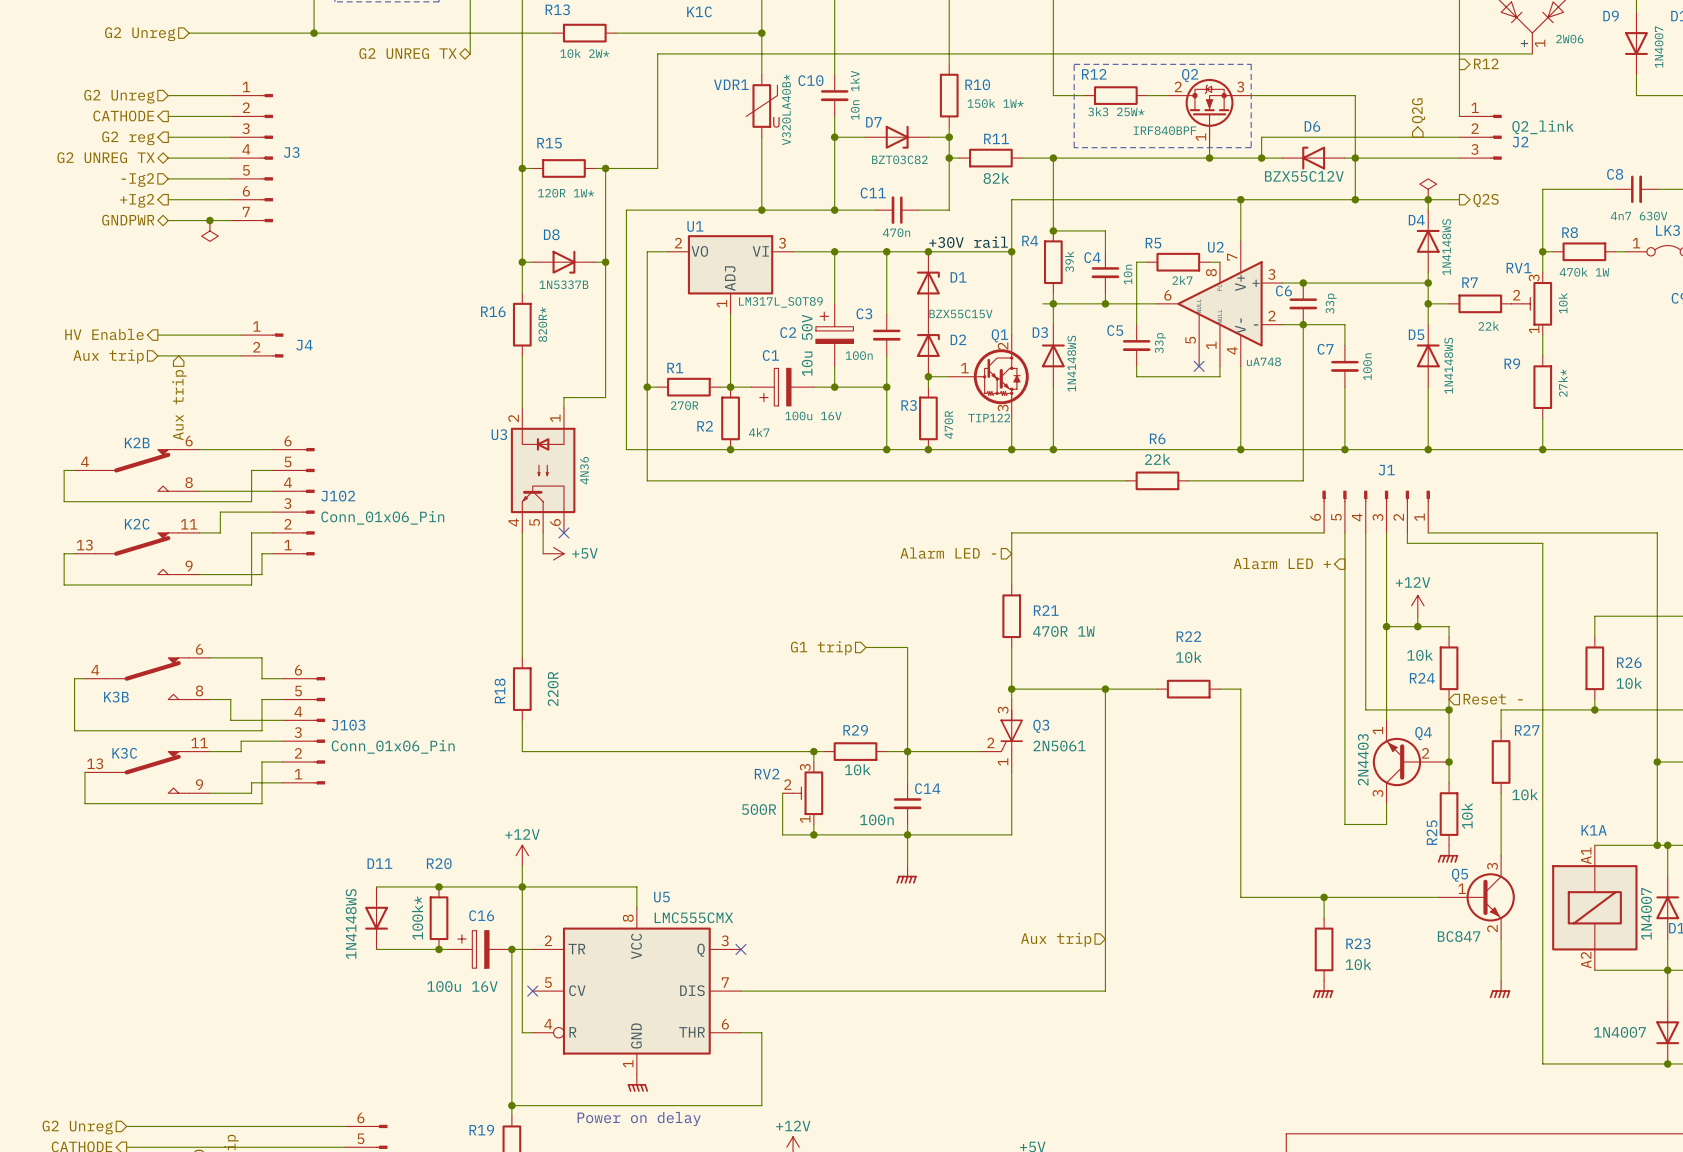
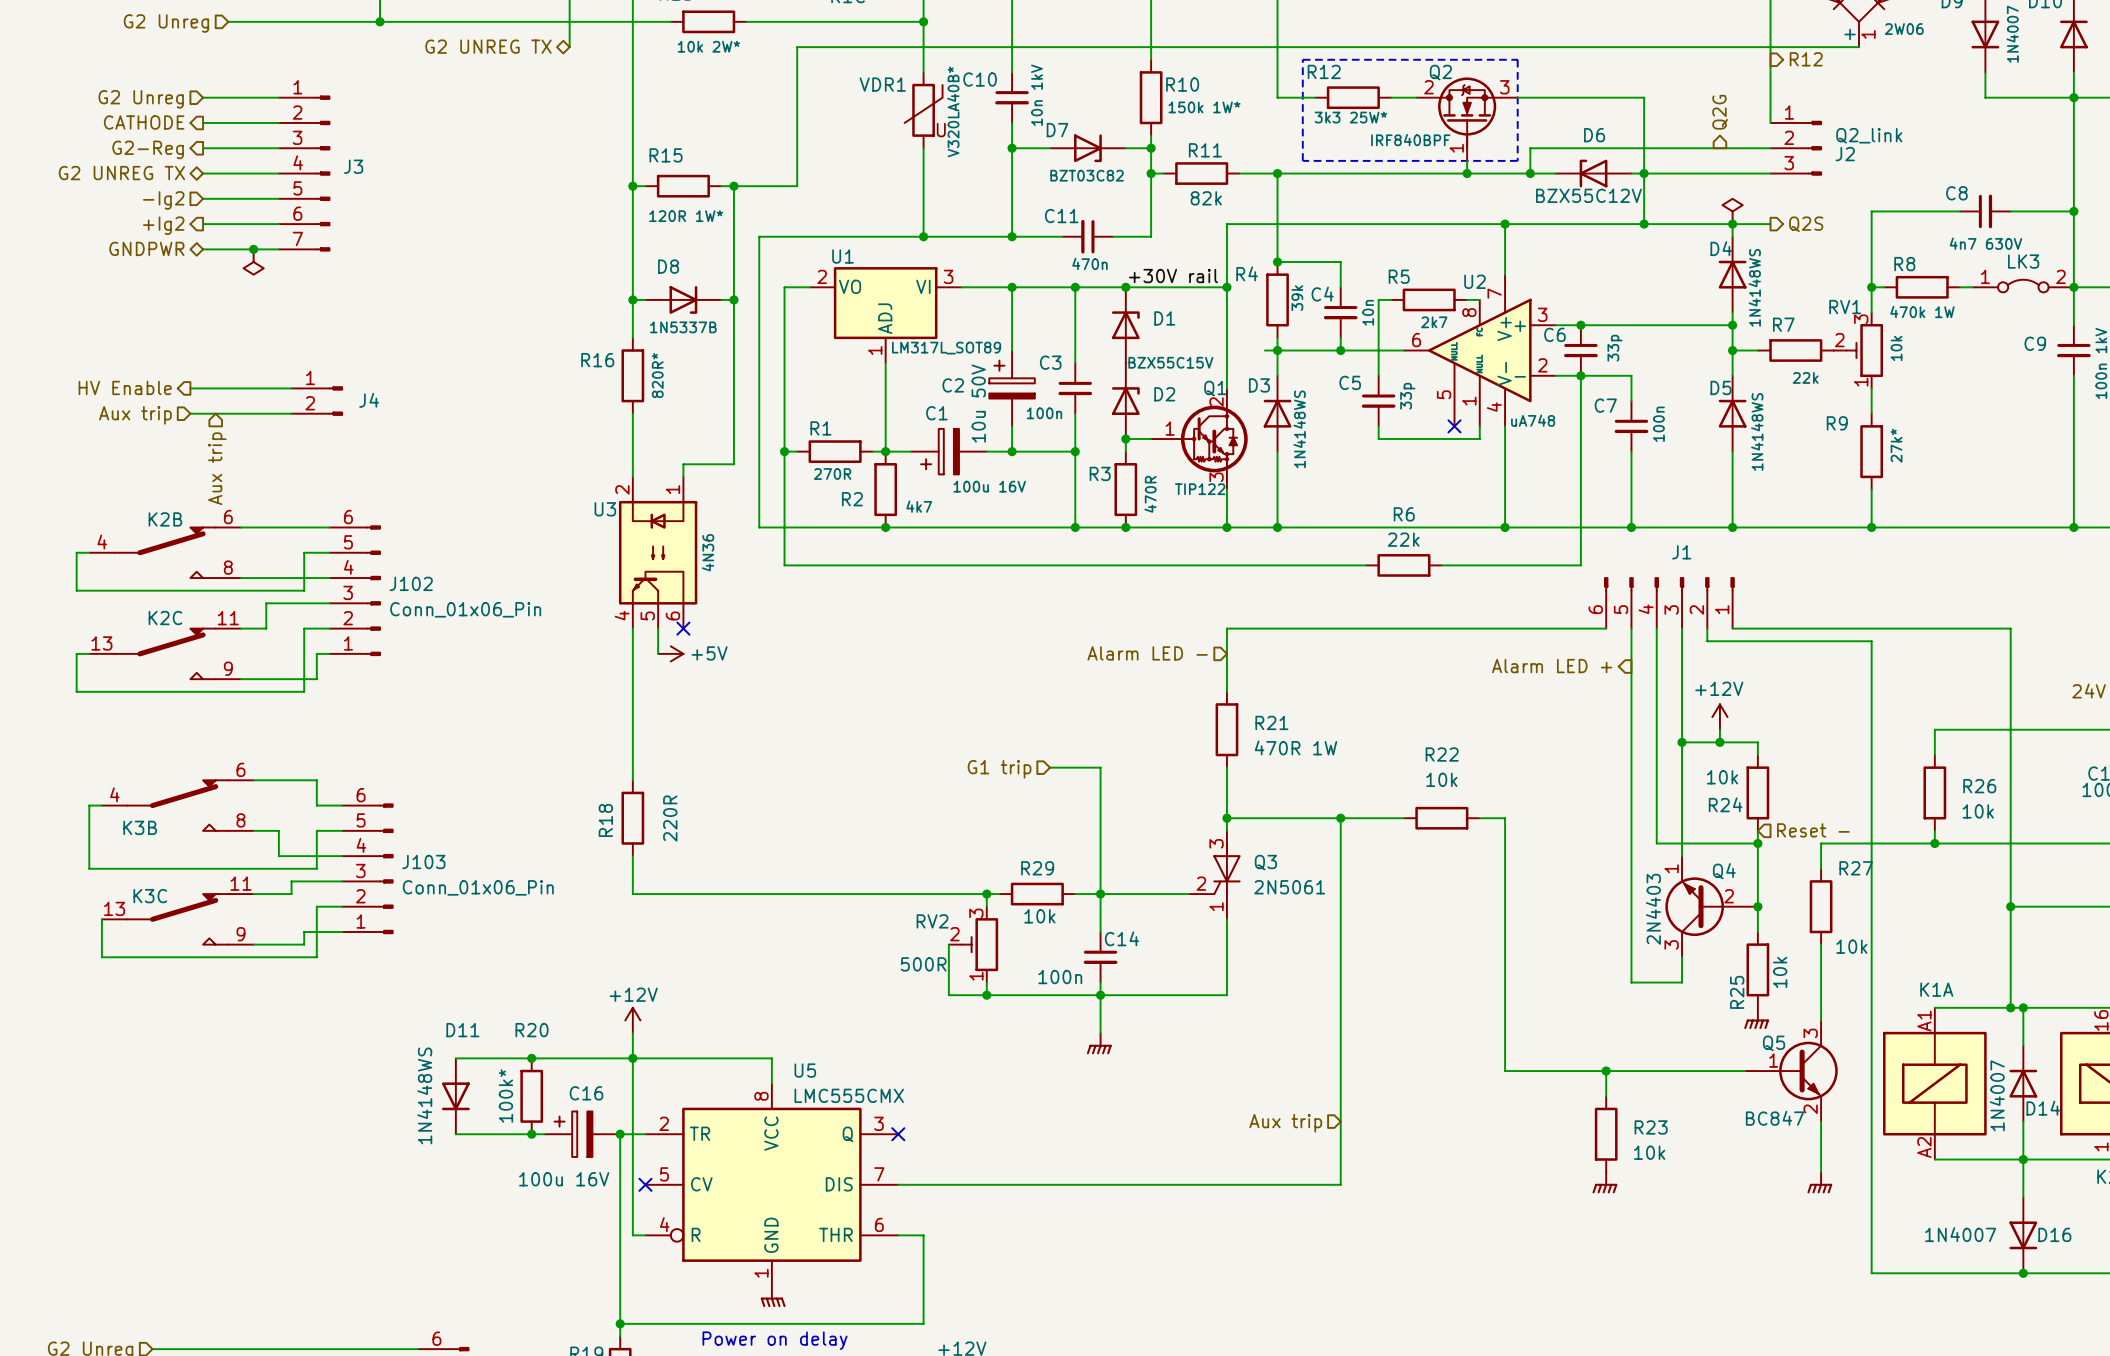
hierarchical label: G2 reg (128, 138) -> G2-Reg (148, 149)

